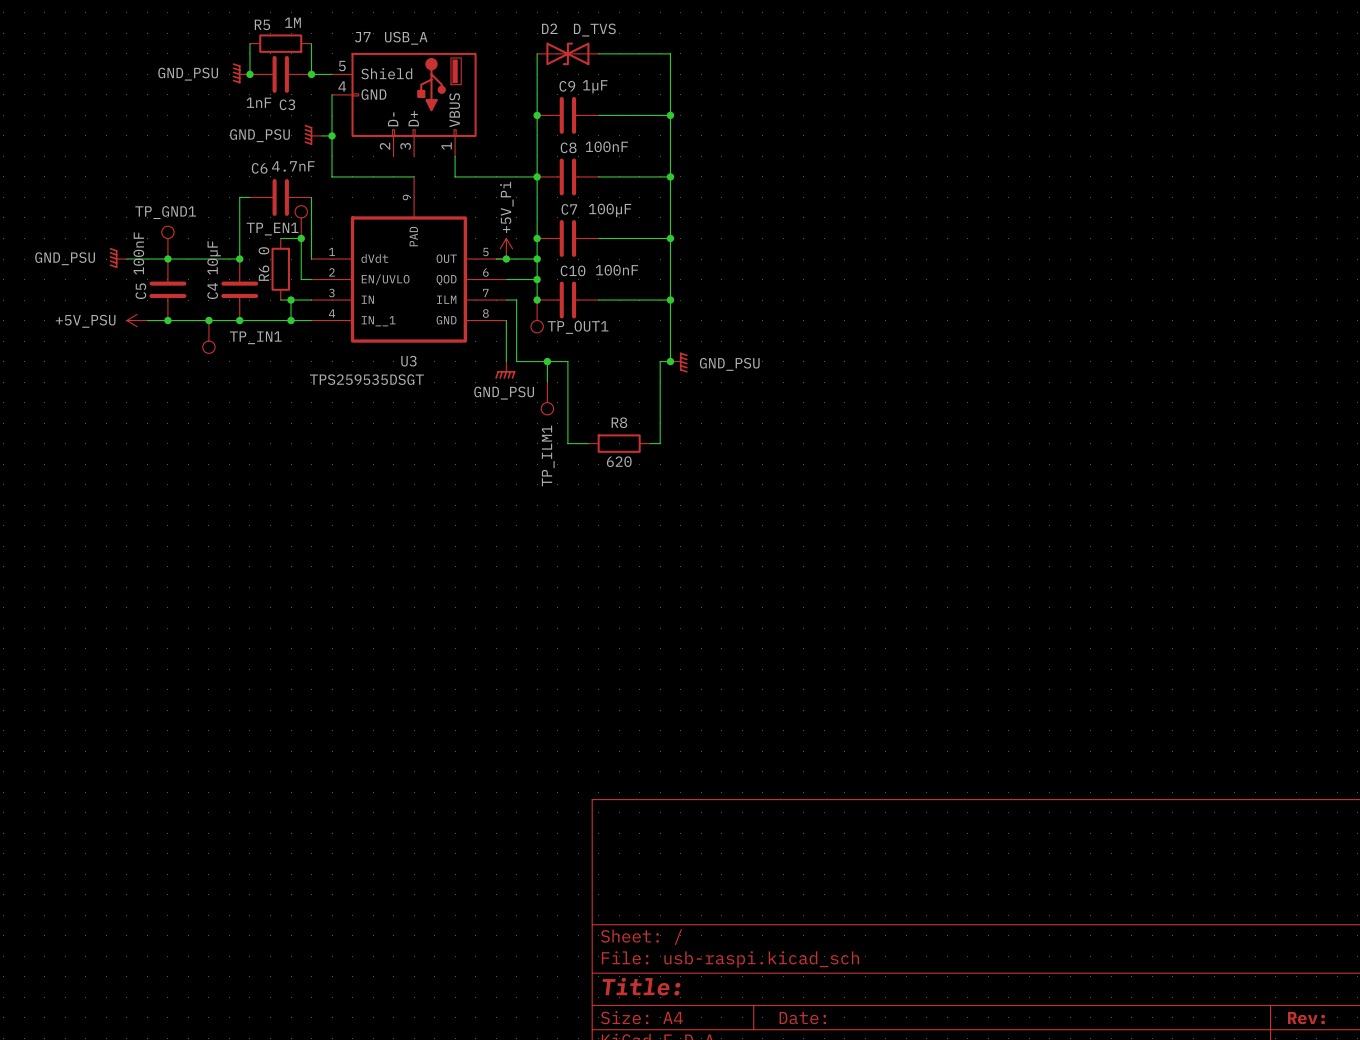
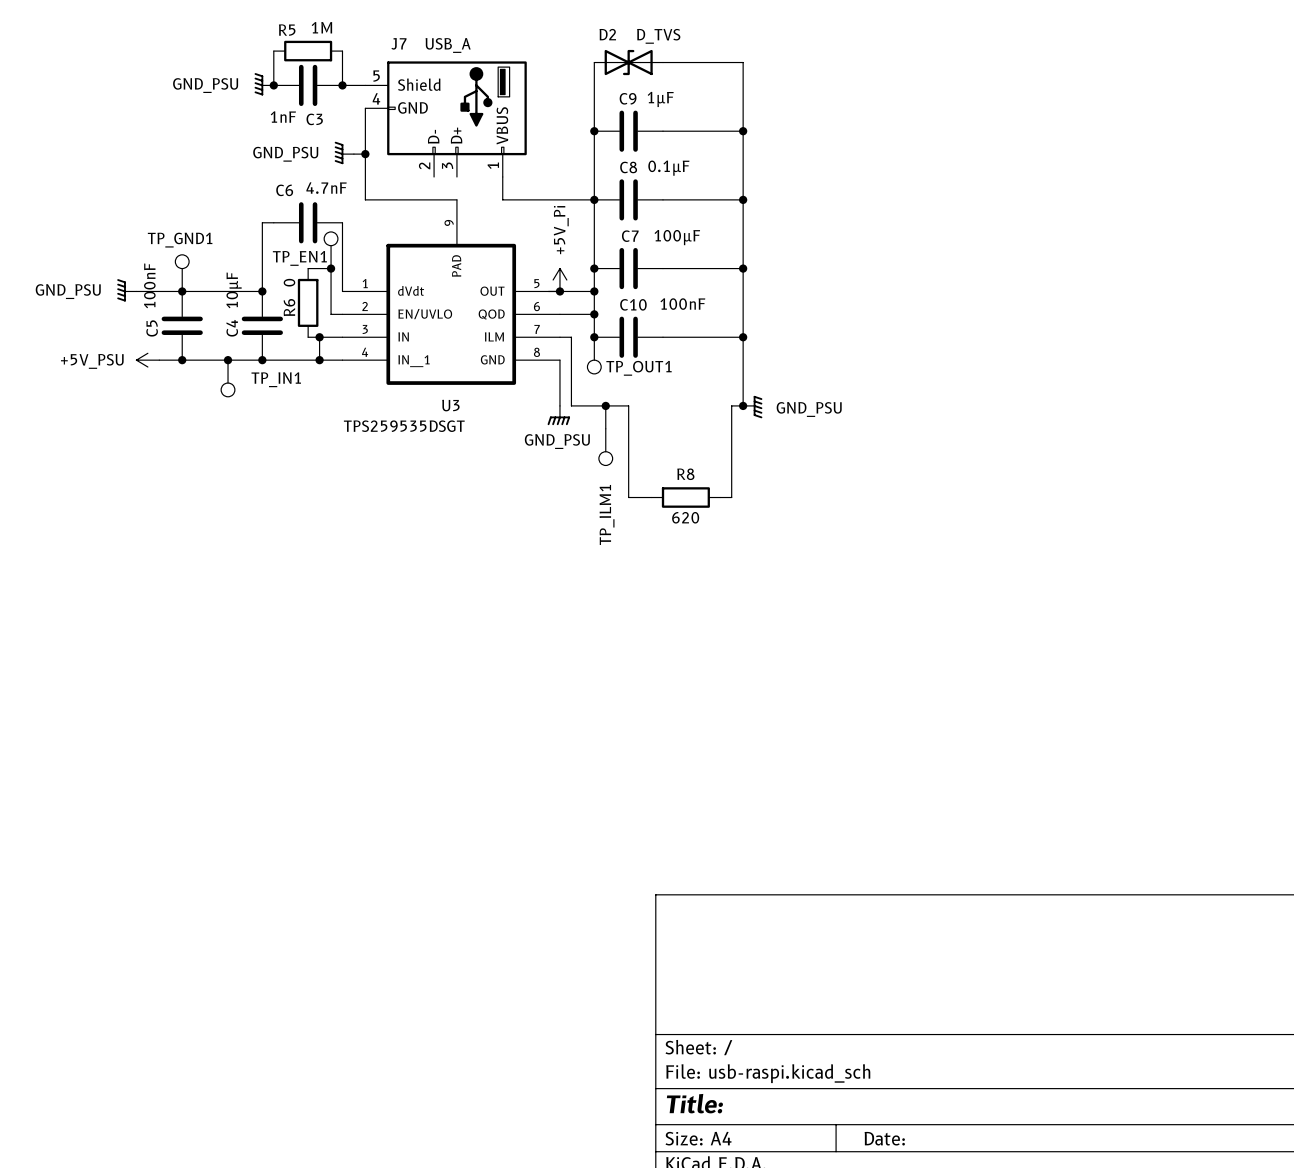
C8 value: 100nF (606, 146) -> 0.1µF (668, 168)

